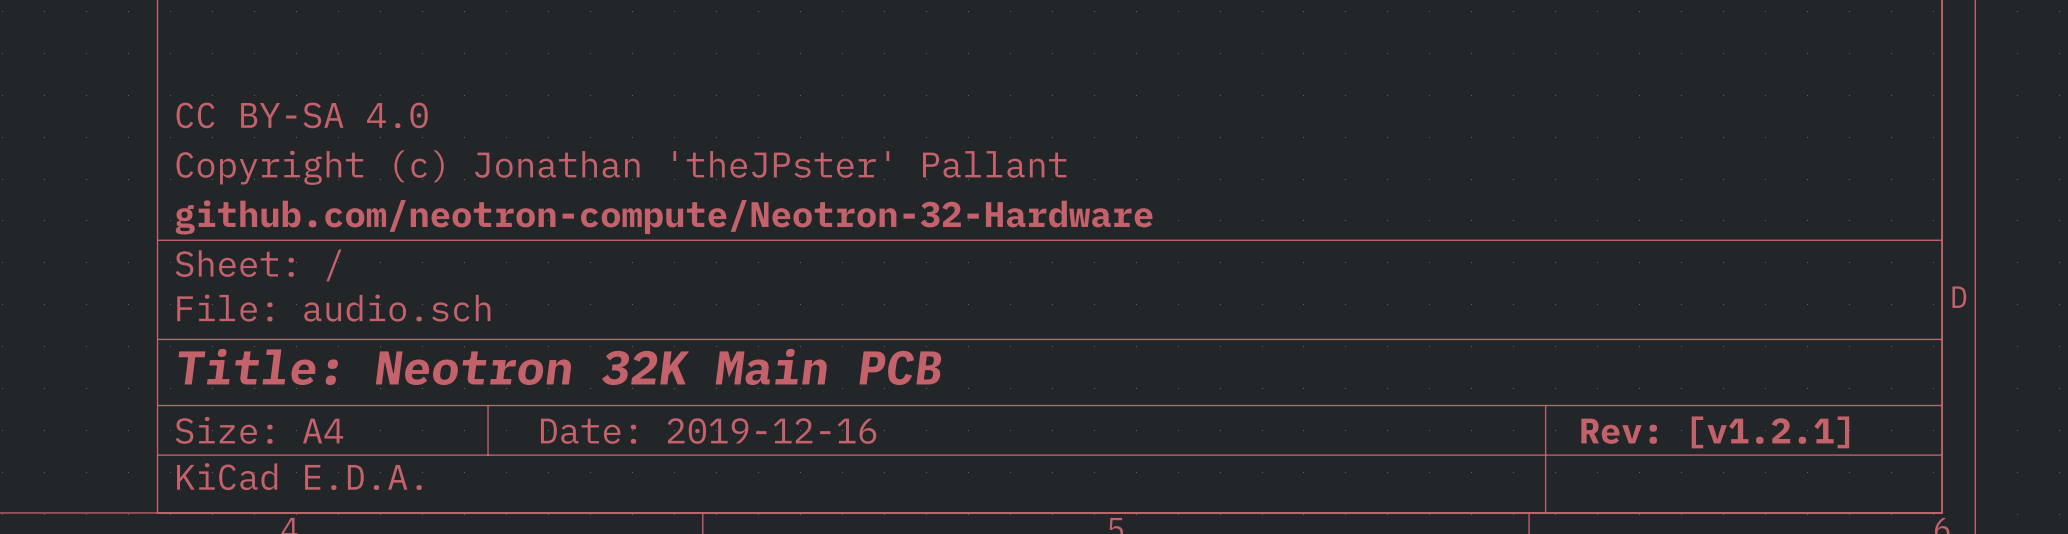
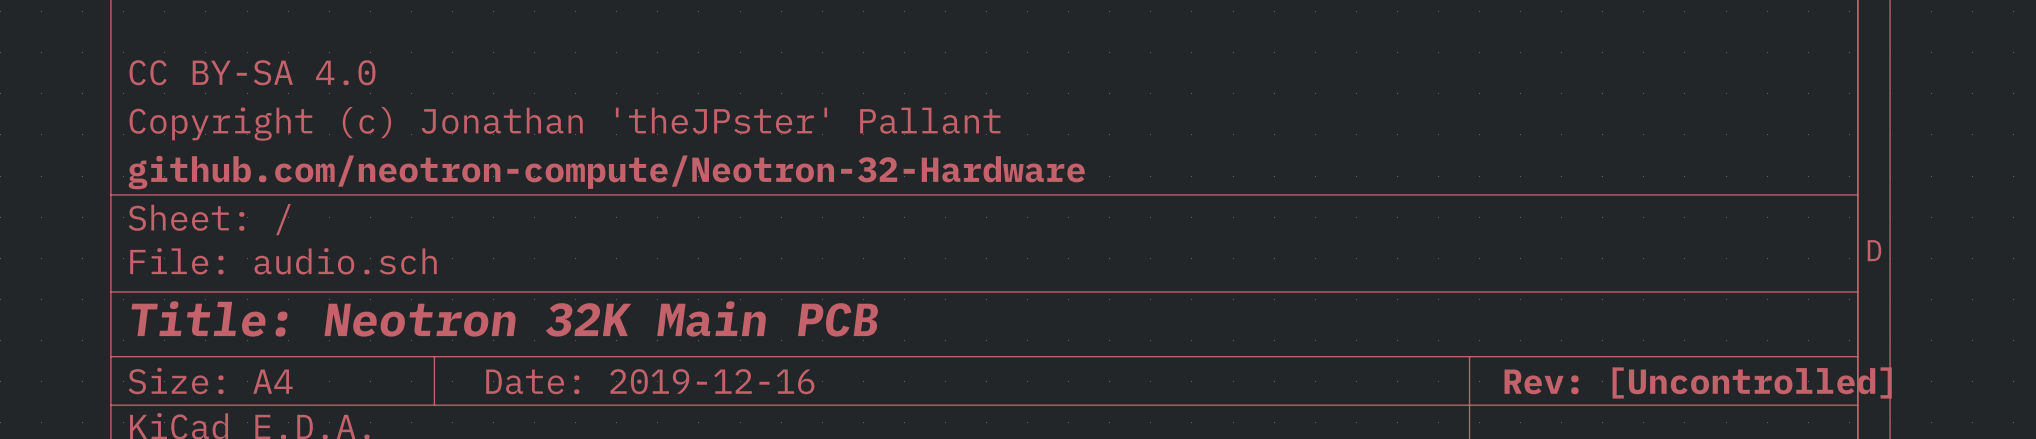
title block: Rev: [v1.2.1] (1715, 432) -> Rev: [Uncontrolled] (1698, 382)

